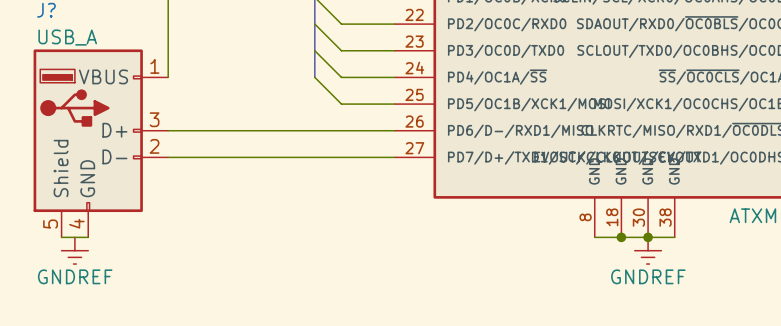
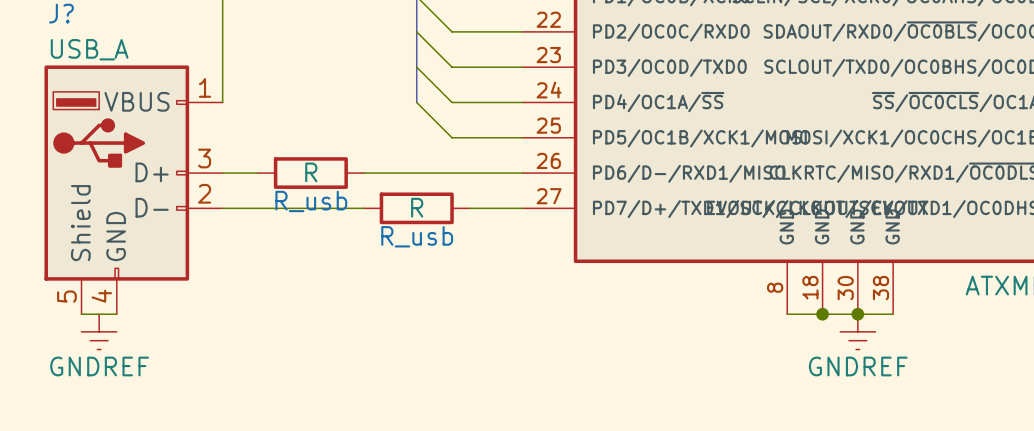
wire: (194, 130) (274, 130) -> none
R_usb: none -> R (310, 173)
wire: (274, 157) (354, 157) -> none
R_usb: none -> R (416, 208)

